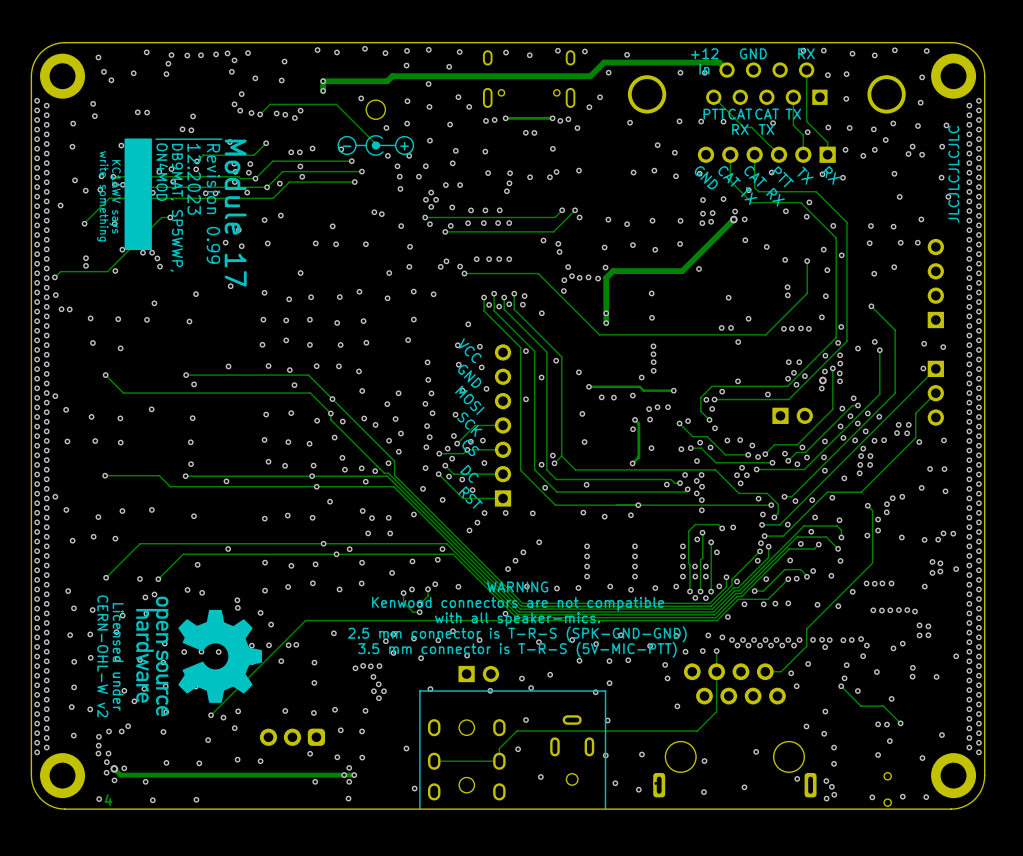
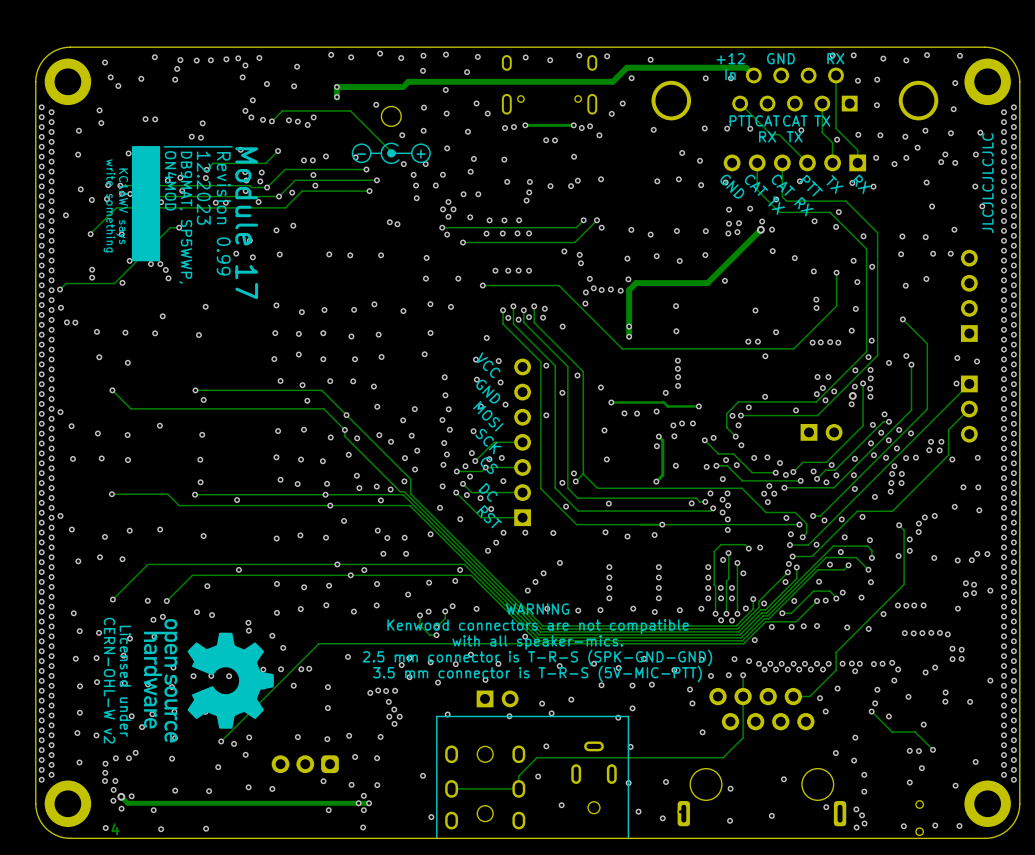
via: (450, 225) -> none
via: (332, 226) -> none
via: (401, 226) -> none
via: (446, 261) -> none
via: (460, 266) -> none
via: (300, 273) -> none
via: (389, 273) -> none
via: (230, 286) -> none
via: (228, 366) -> none

